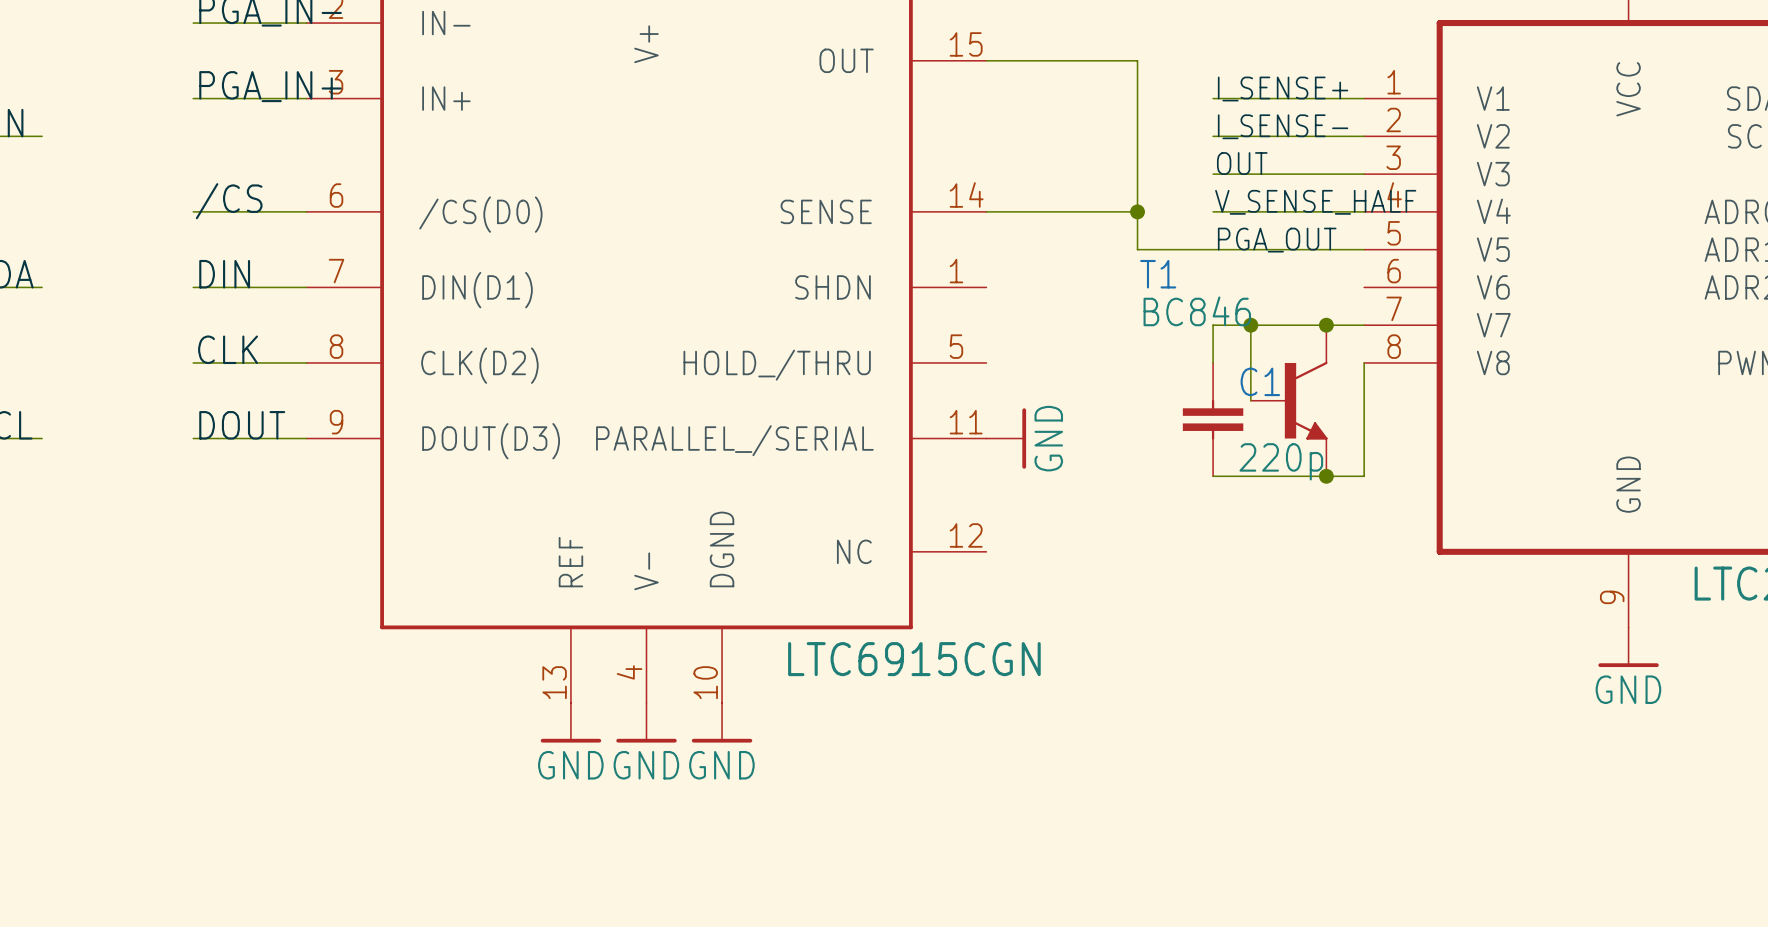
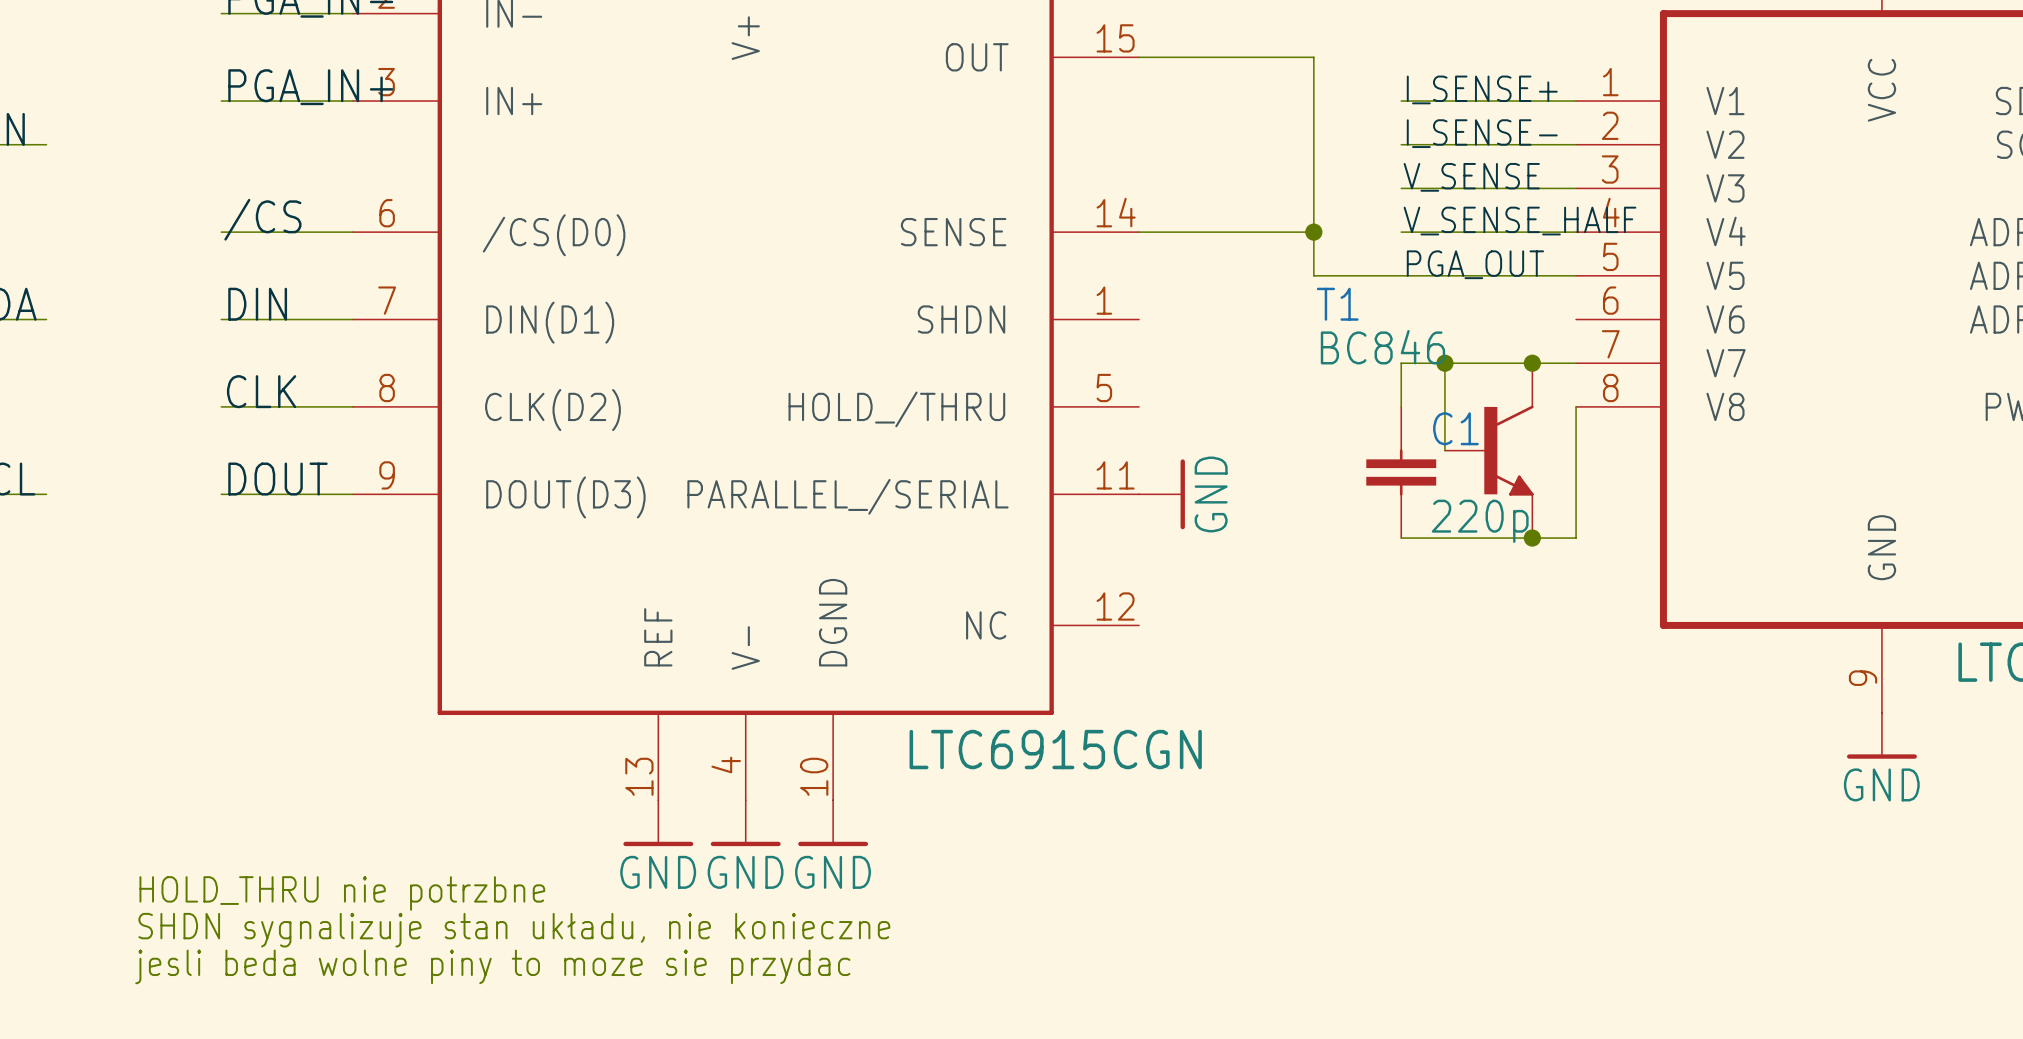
label: OUT (1242, 163) -> V_SENSE (1471, 177)
text: none -> HOLD_THRU nie potrzbne (342, 893)
text: none -> SHDN sygnalizuje stan układu, nie konieczne (514, 930)
text: none -> jesli beda wolne piny to moze sie przydac (492, 966)

